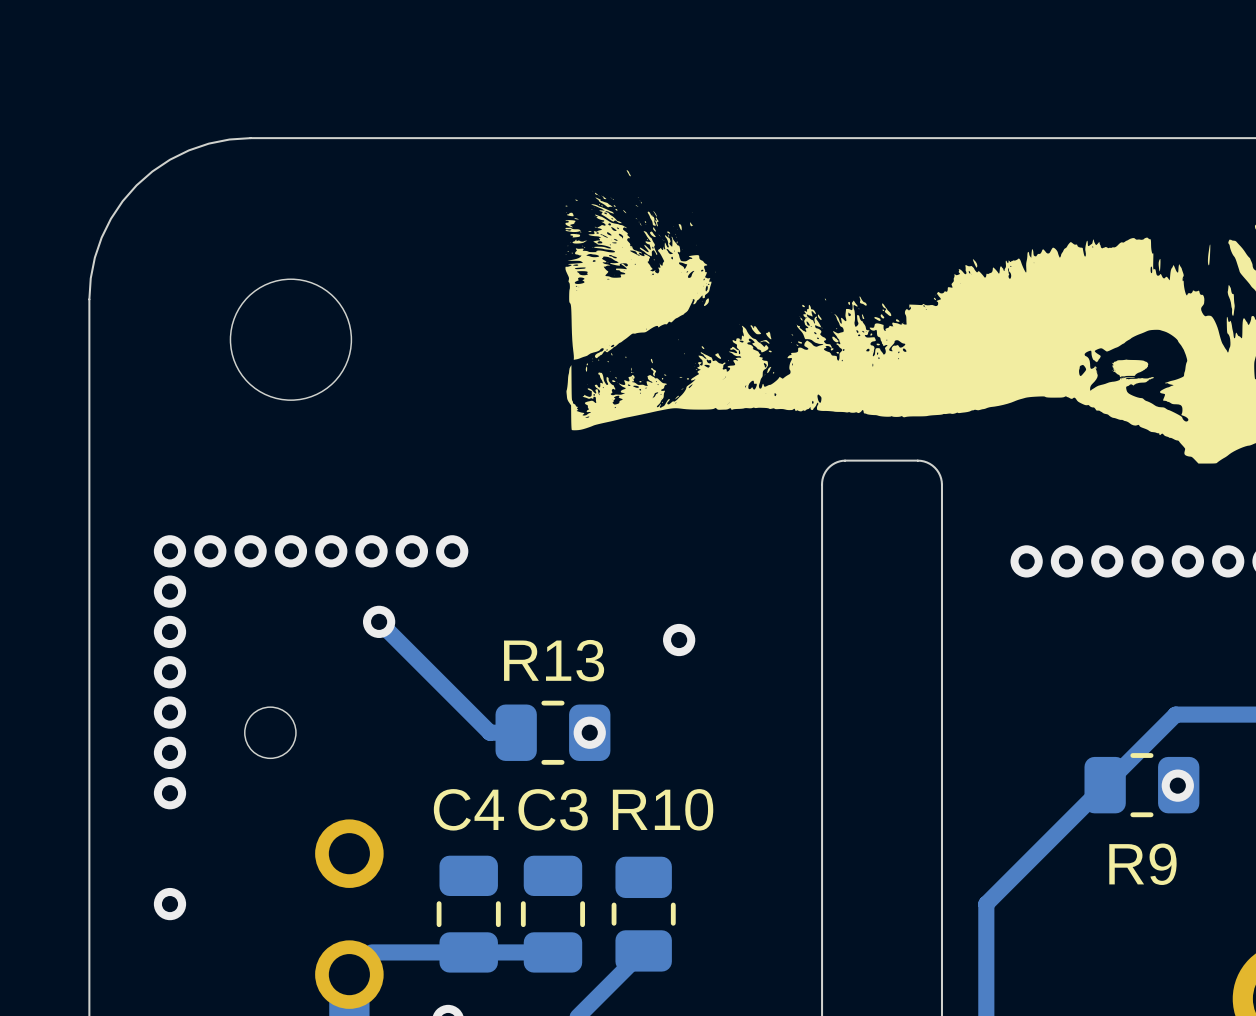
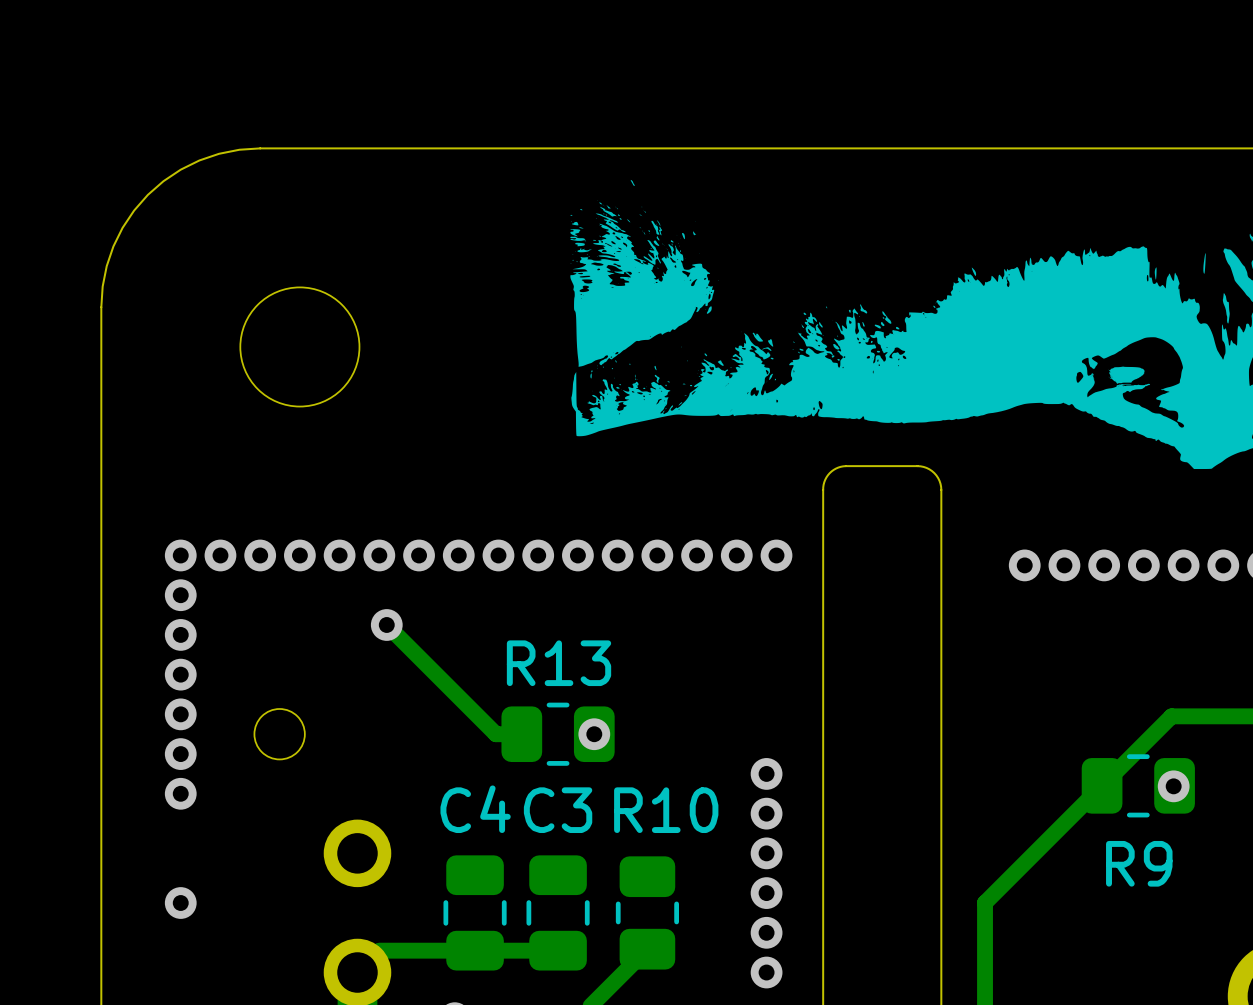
via: none -> (498, 555)
via: none -> (538, 555)
via: none -> (577, 555)
via: none -> (617, 555)
via: none -> (657, 555)
via: none -> (697, 555)
via: none -> (736, 555)
via: none -> (776, 555)
via: (679, 640) -> none
via: none -> (766, 773)
via: none -> (766, 813)
via: none -> (766, 853)
via: none -> (766, 893)
via: none -> (766, 932)
via: none -> (766, 972)

